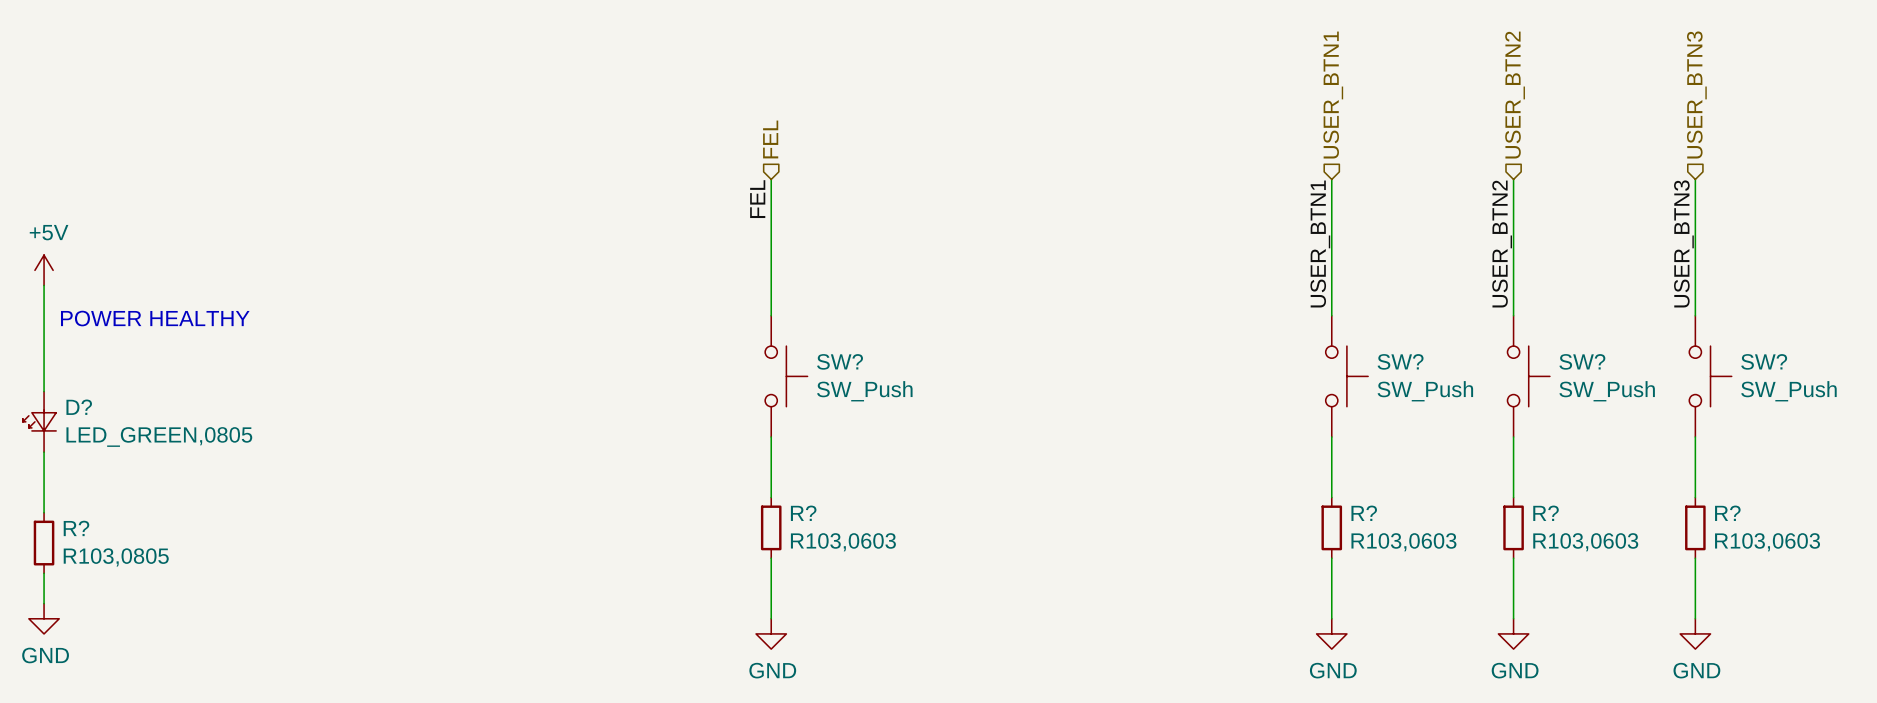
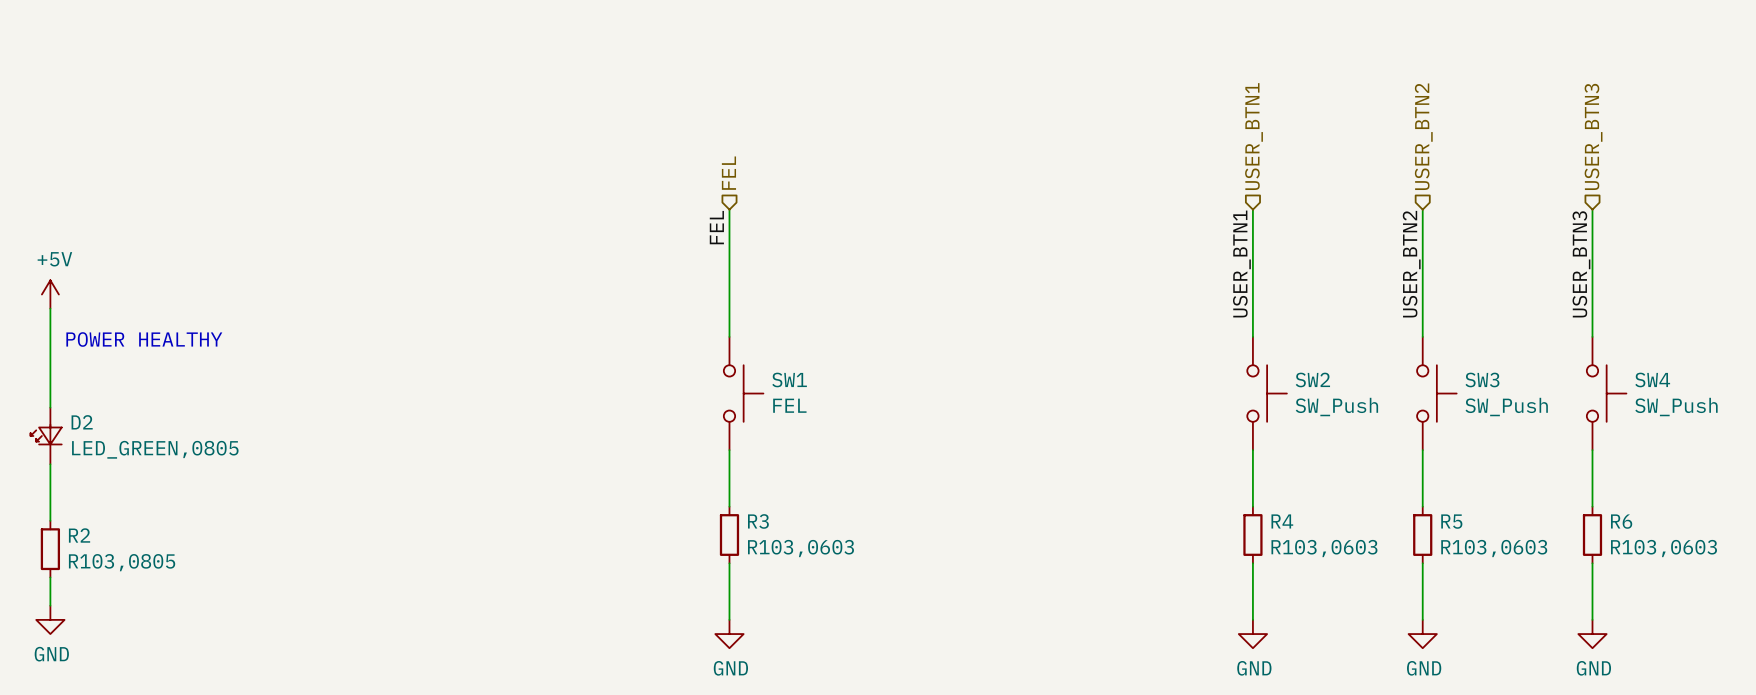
SW? name: SW? (840, 361) -> SW1 (789, 379)
SW? name: SW? (1400, 361) -> SW2 (1312, 379)
SW? name: SW? (1582, 361) -> SW3 (1482, 379)
SW? name: SW? (1764, 361) -> SW4 (1652, 379)
SW? value: SW_Push (864, 391) -> FEL (789, 405)
D? name: D? (79, 407) -> D2 (82, 422)
R? name: R? (803, 513) -> R3 (758, 521)
R? name: R? (1364, 513) -> R4 (1282, 521)
R? name: R? (1546, 513) -> R5 (1451, 521)
R? name: R? (1727, 513) -> R6 (1621, 521)
R? name: R? (76, 528) -> R2 (79, 535)

